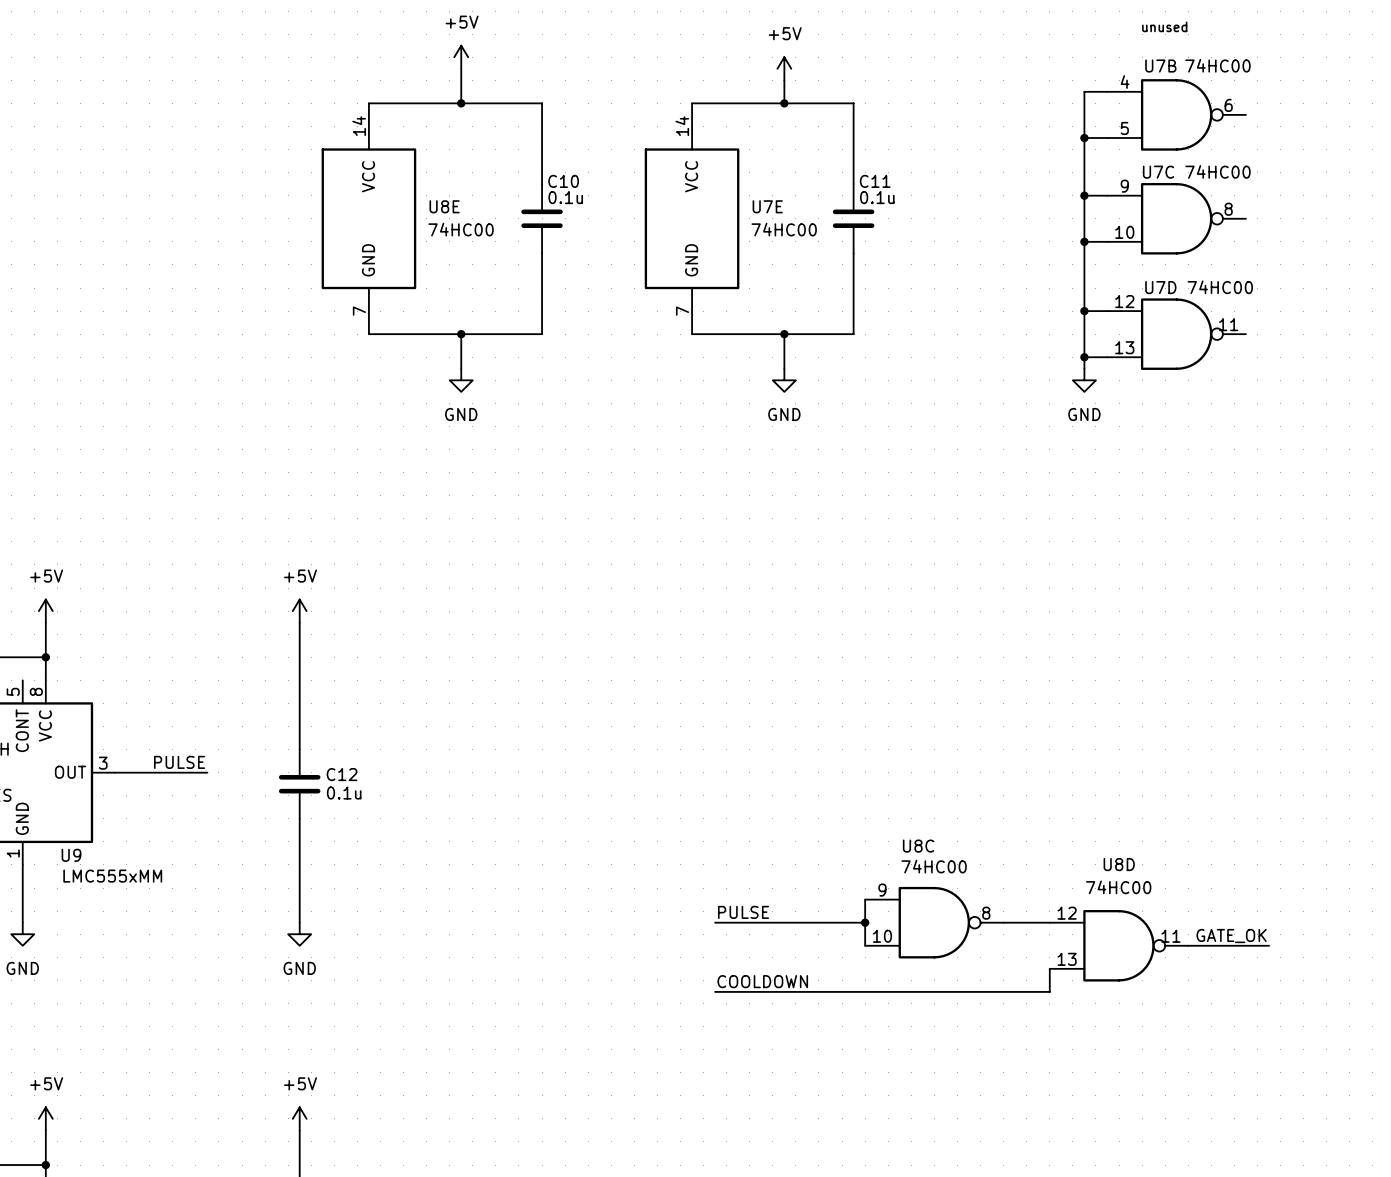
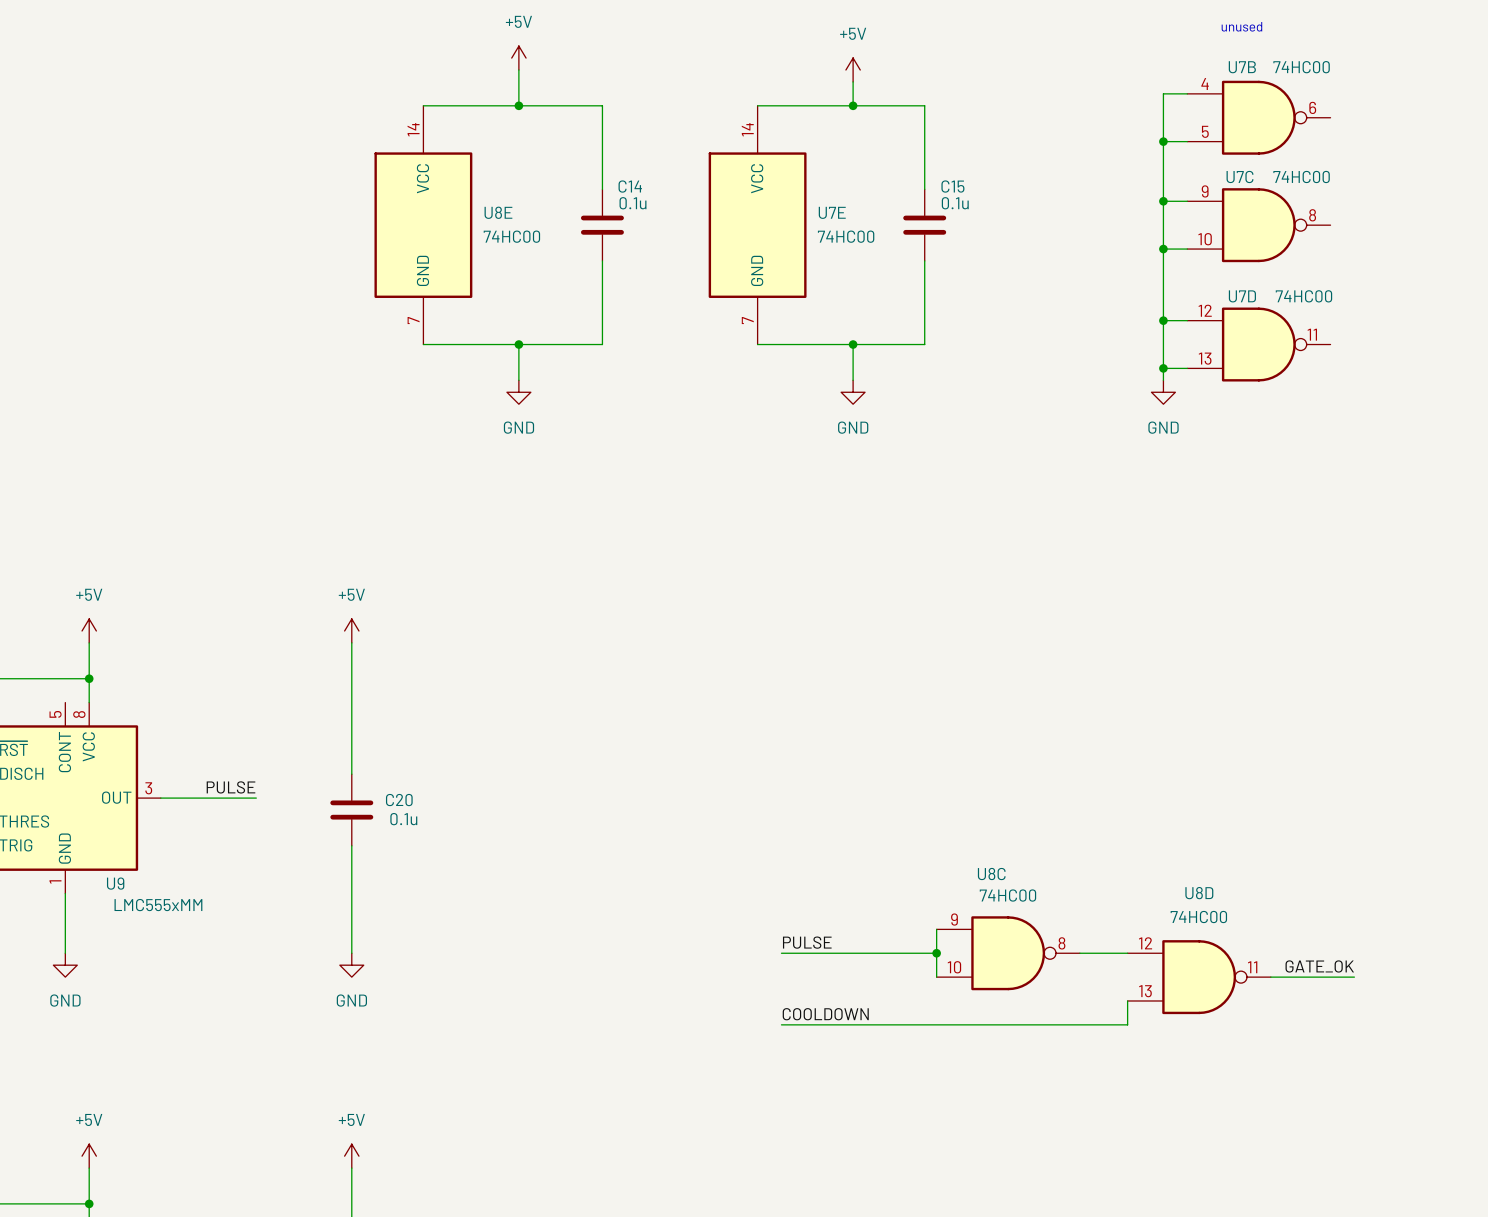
C10 name: C10 (563, 181) -> C14 (630, 186)
C11 name: C11 (875, 181) -> C15 (952, 186)
C12 name: C12 (342, 774) -> C20 (399, 800)

